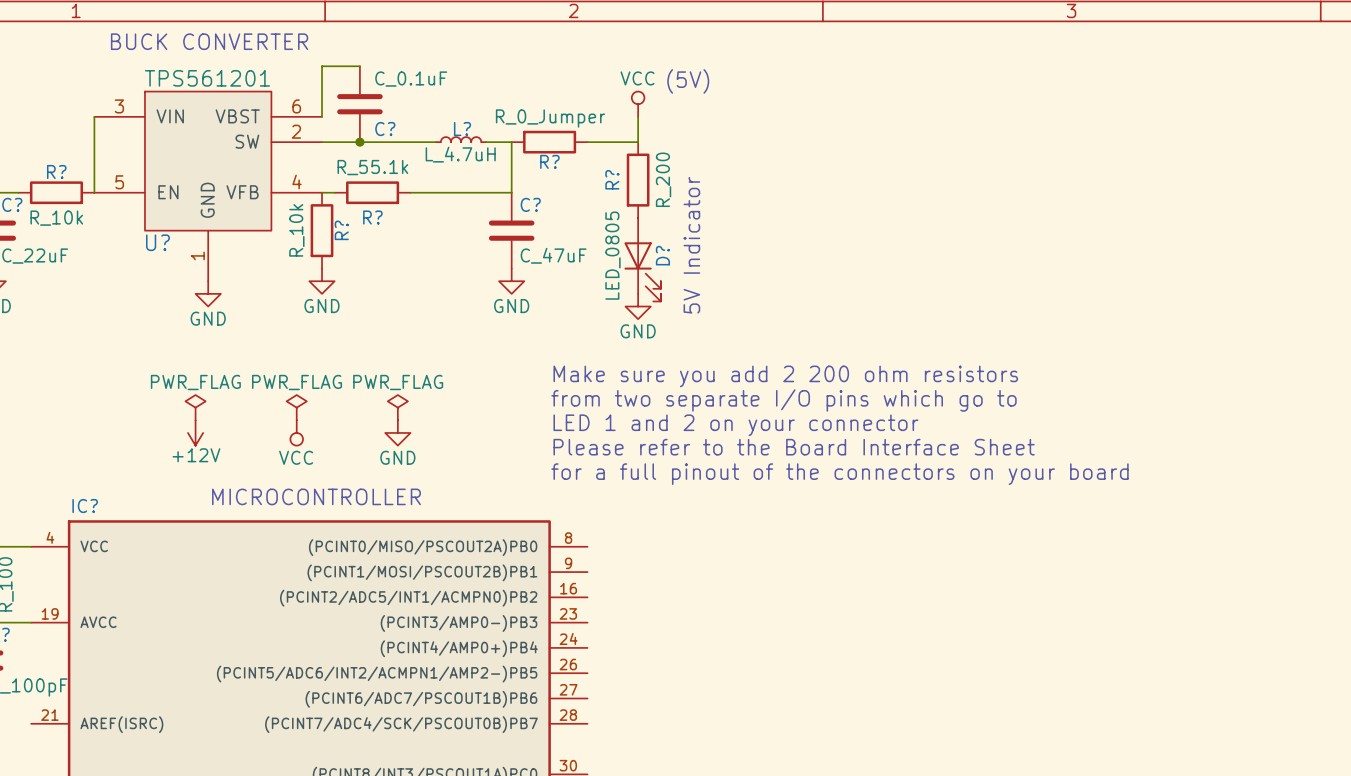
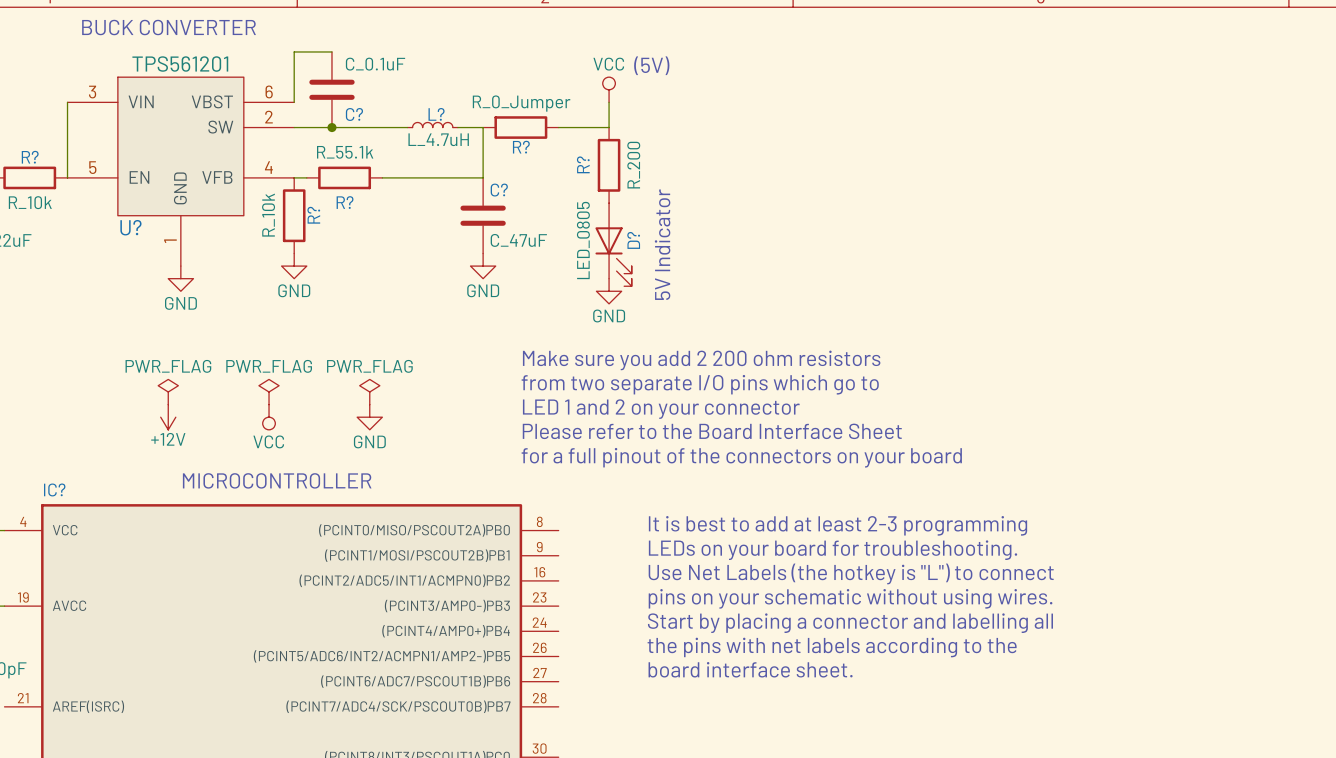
text: none -> It is best to add at least 2-3 programming (838, 525)
text: none -> LEDs on your board for troubleshooting. (833, 550)
text: none -> Use Net Labels (the hotkey is "L") to connect (851, 573)
text: none -> pins on your schematic without using wires. (850, 598)
text: none -> Start by placing a connector and labelling all (850, 623)
text: none -> the pins with net labels according to the (832, 647)
text: none -> board interface sheet. (750, 669)

